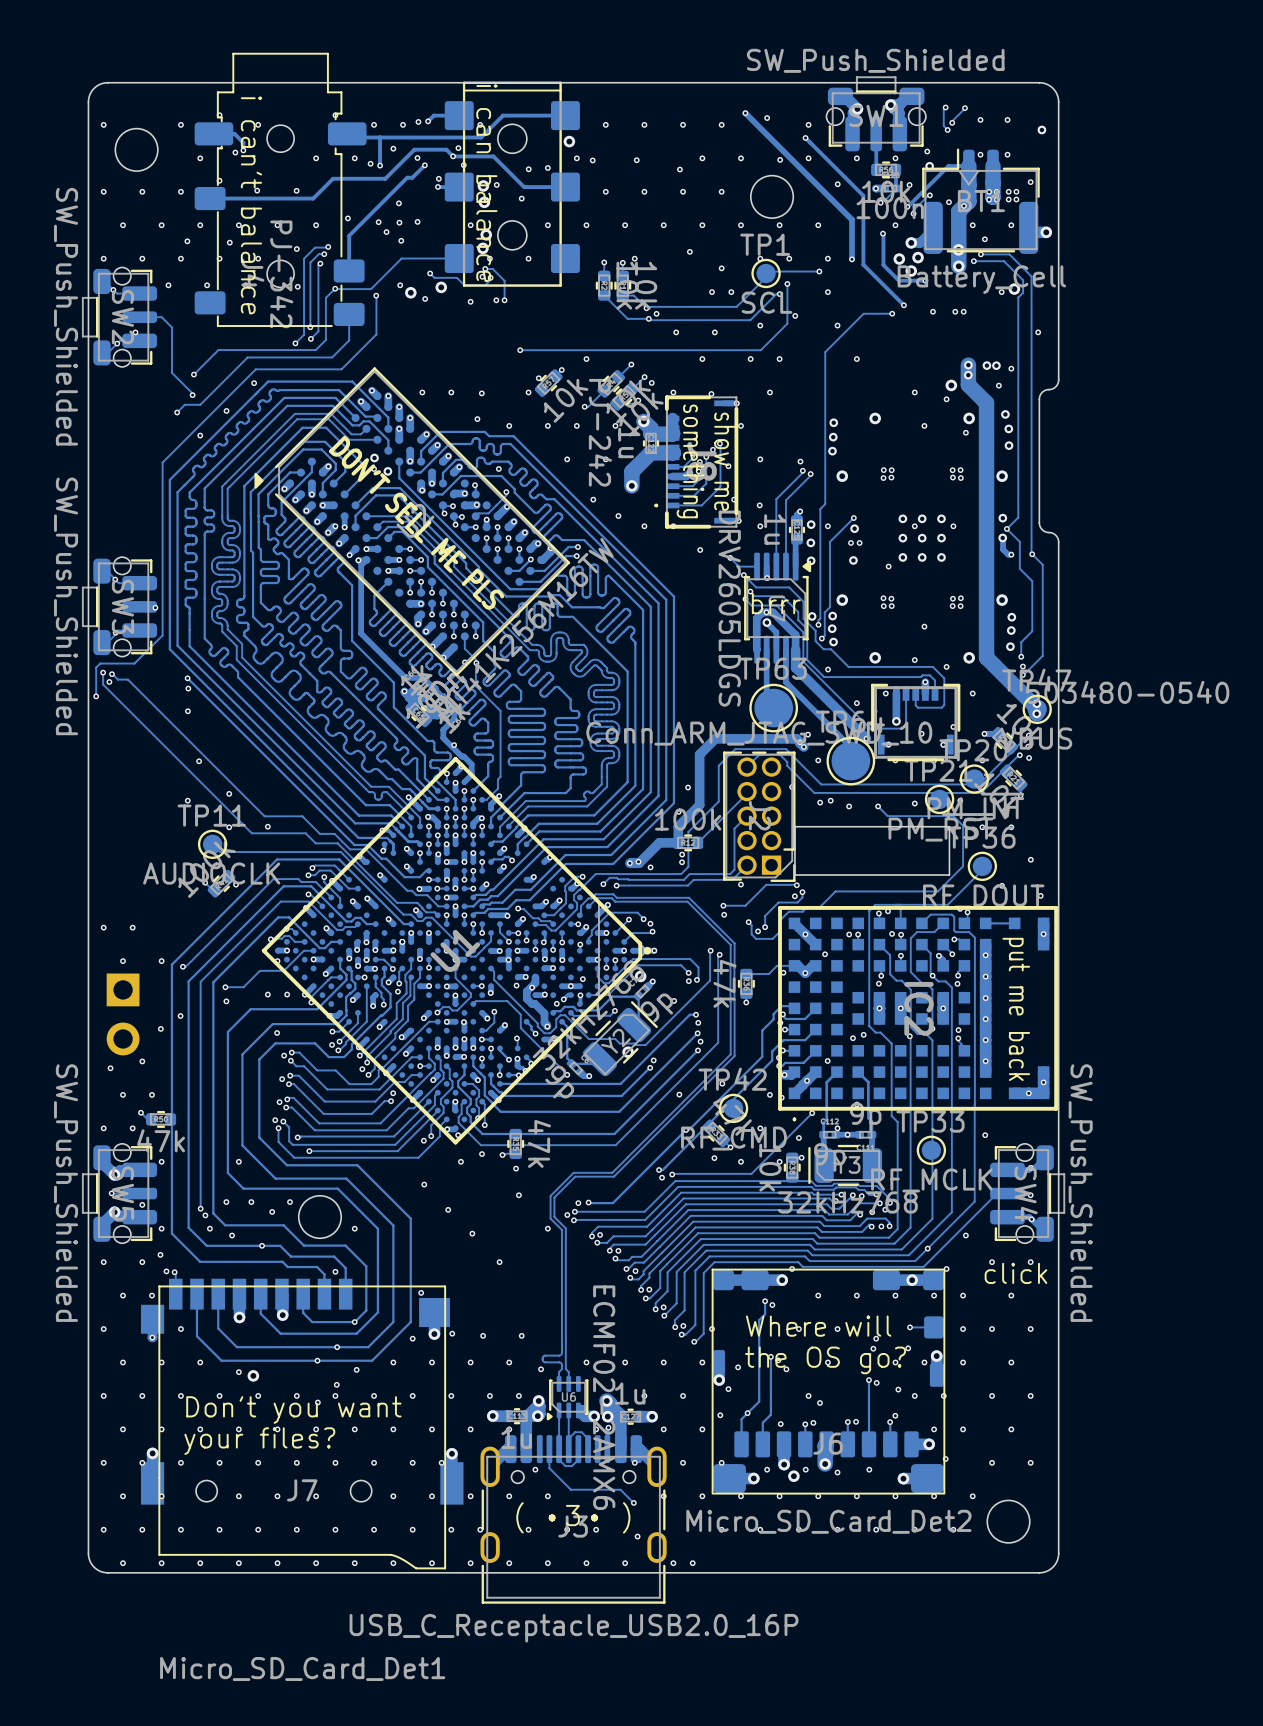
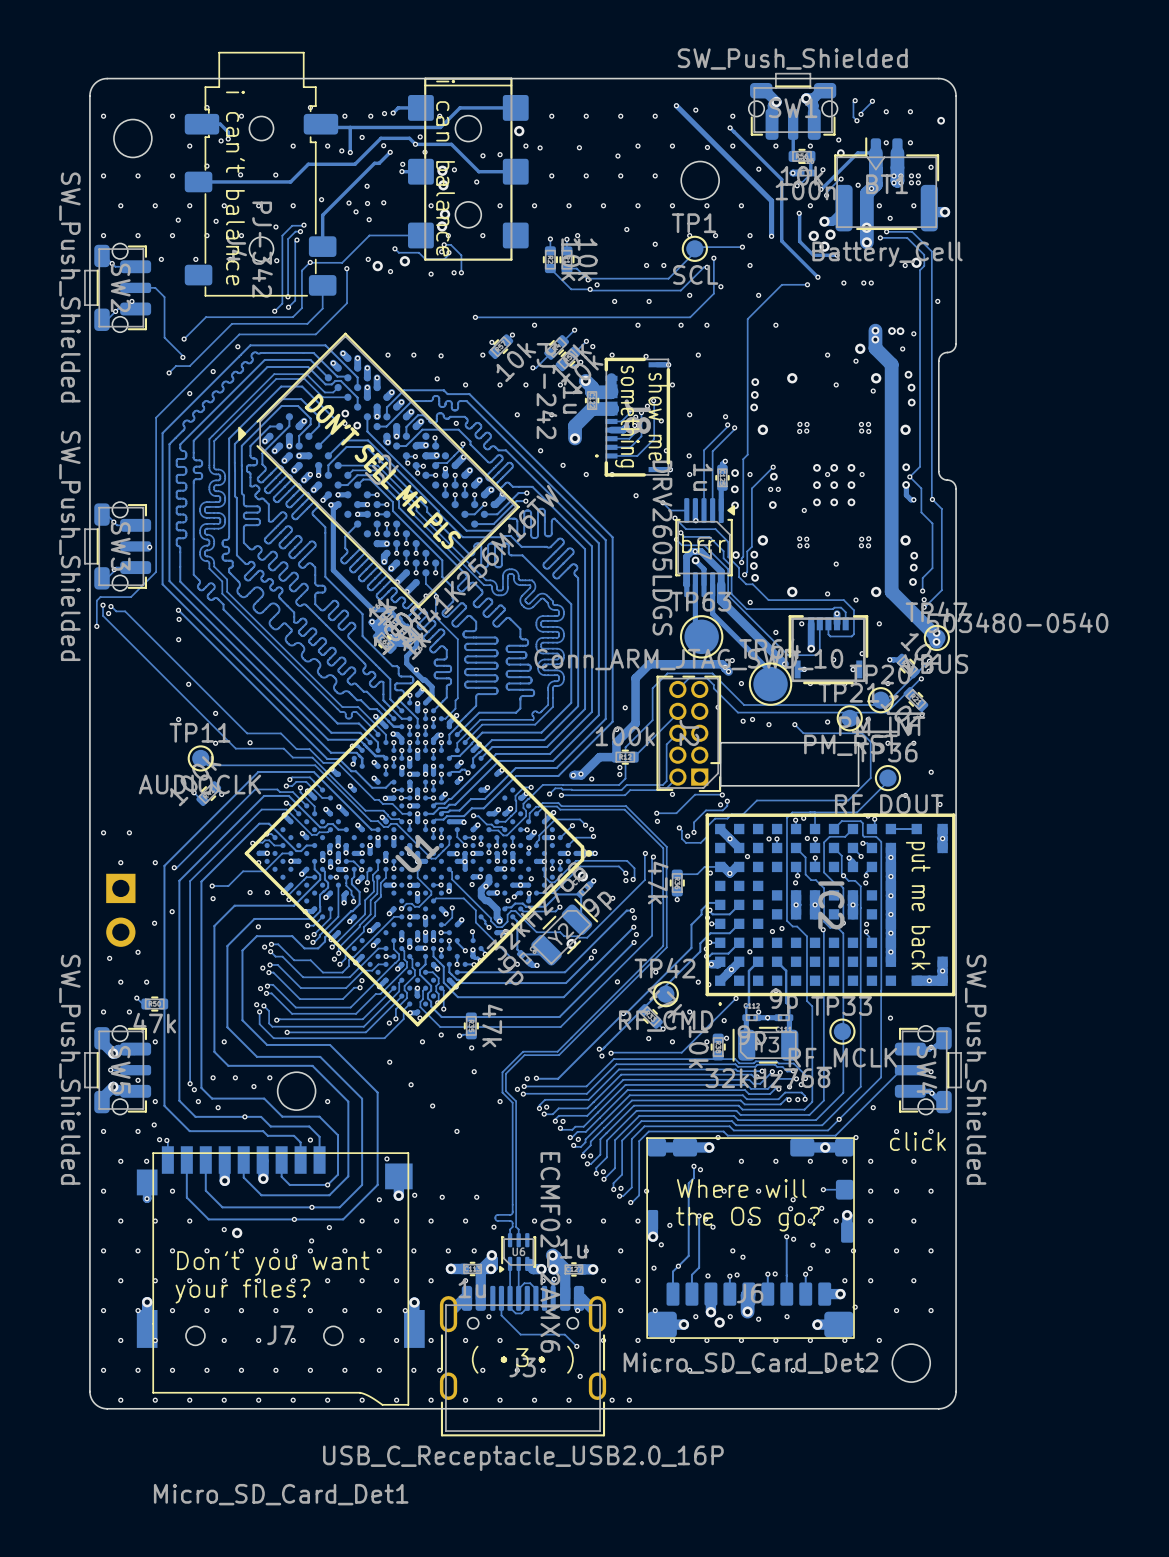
via: (1029, 757) -> none

